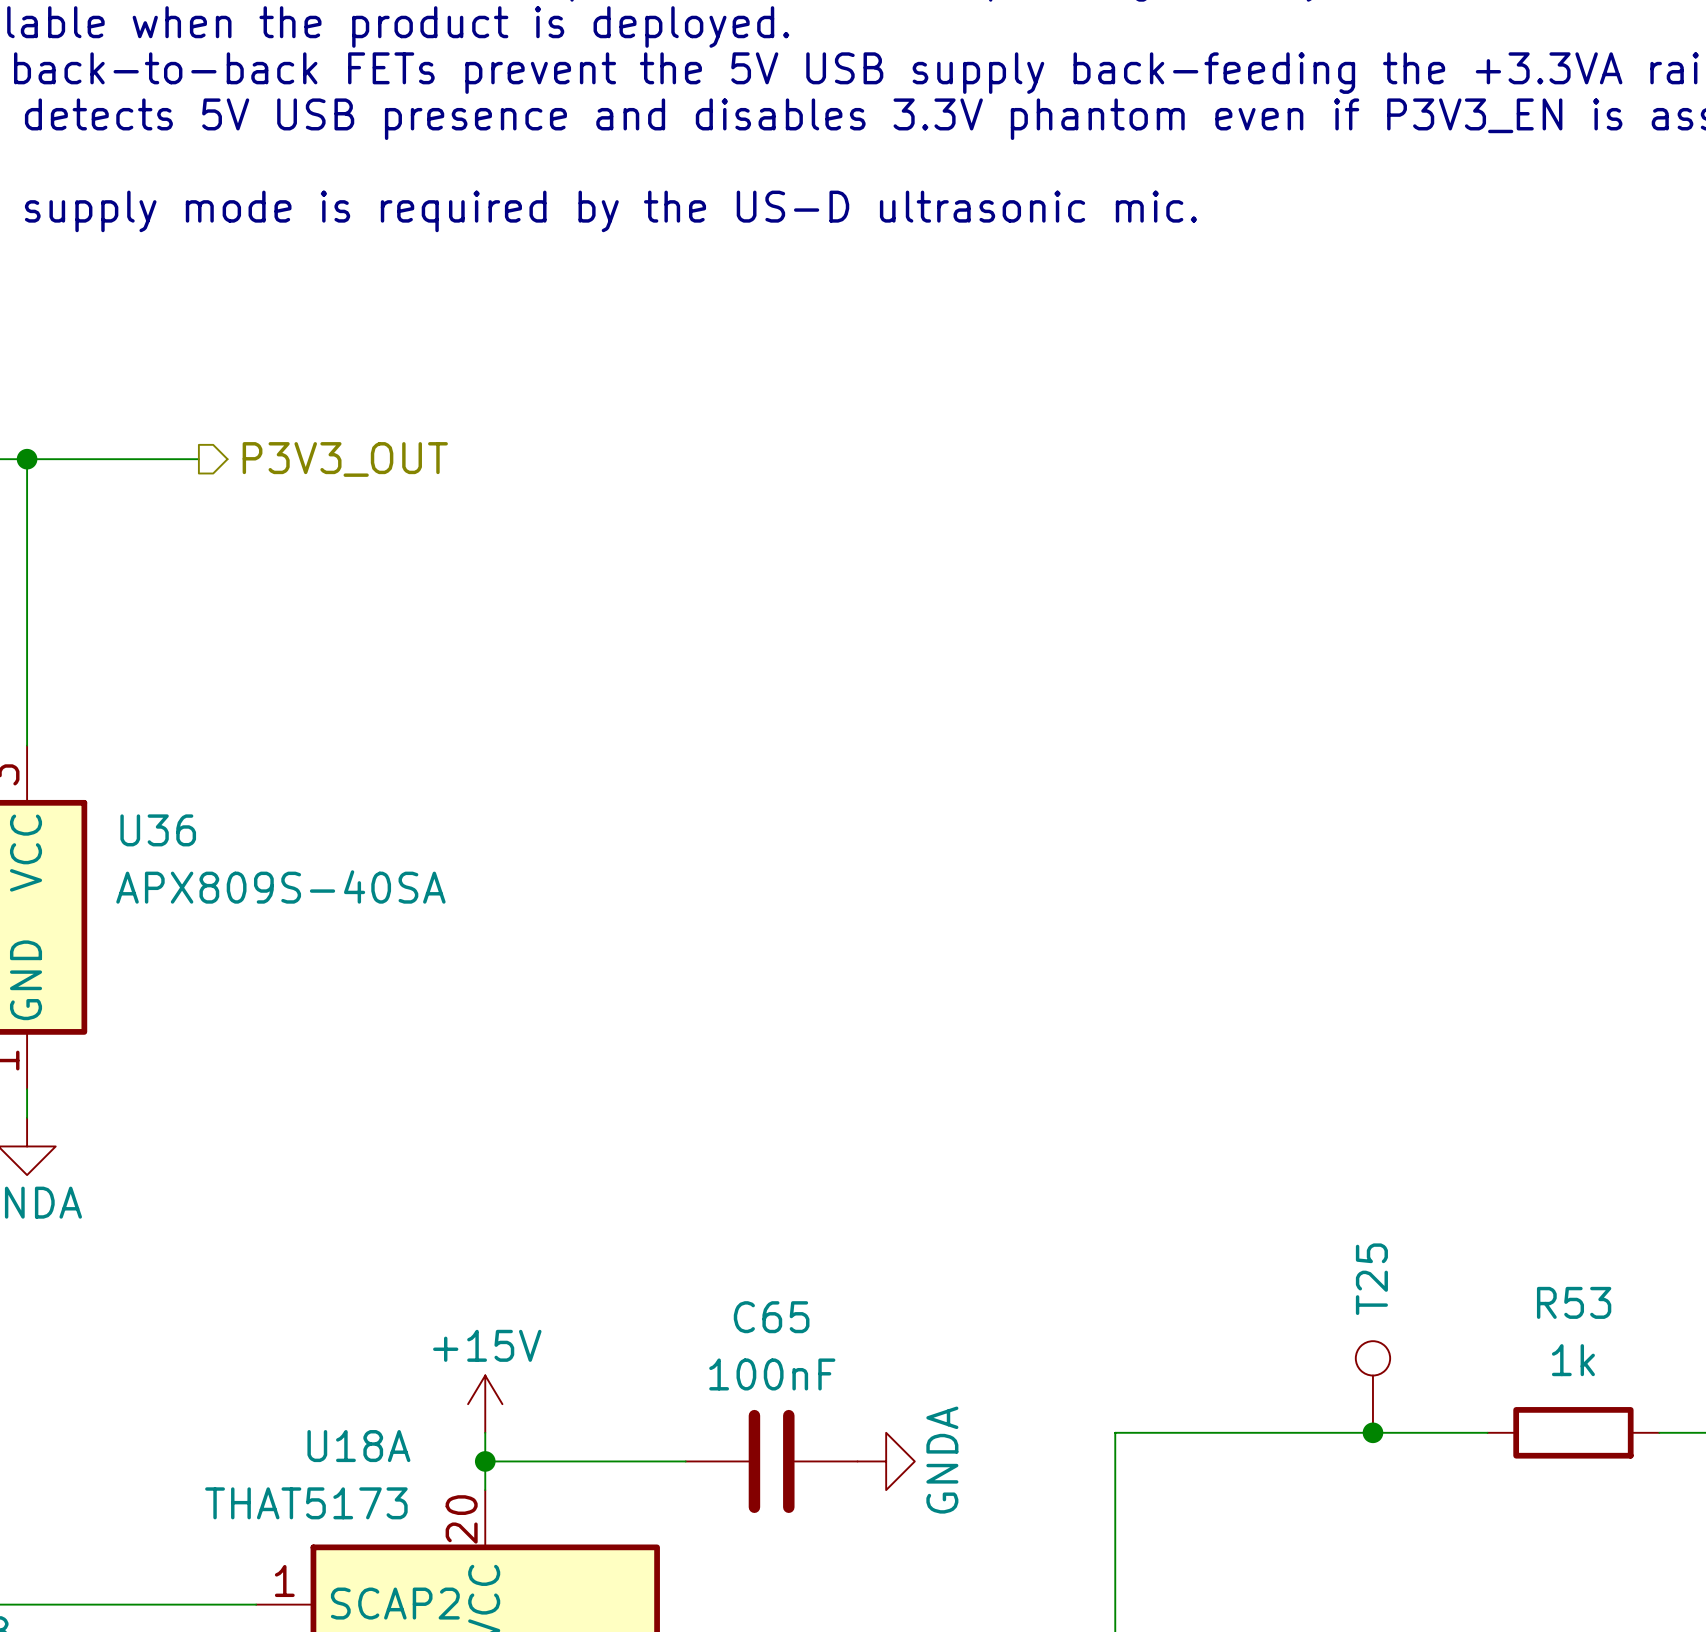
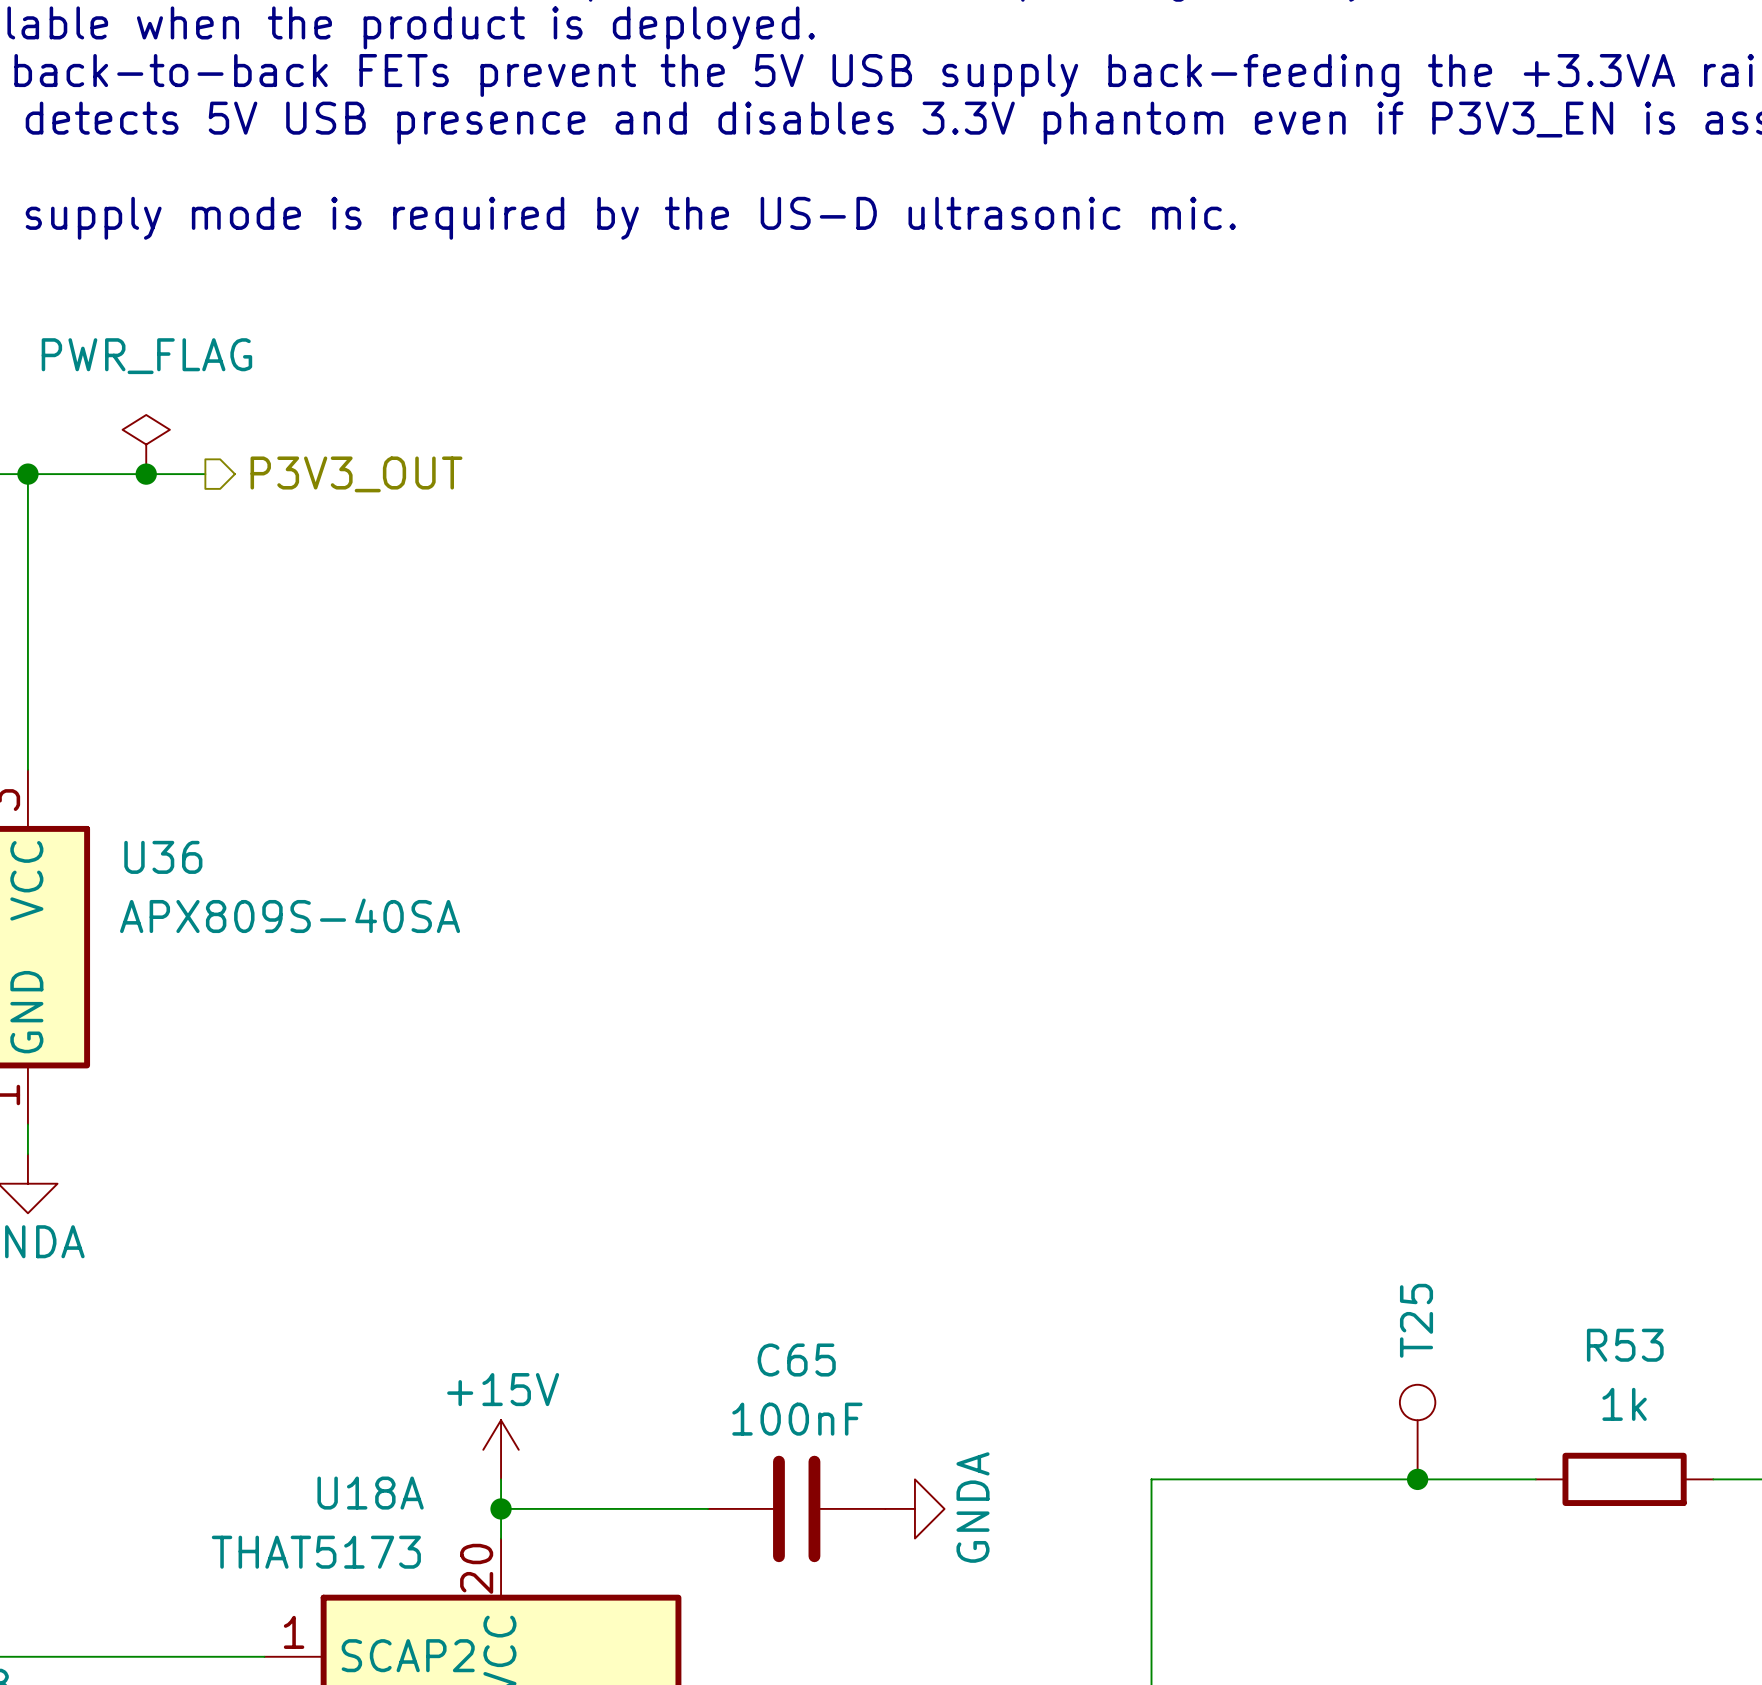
power symbol: none -> PWR_FLAG (146, 444)
junction: none -> (146, 474)

